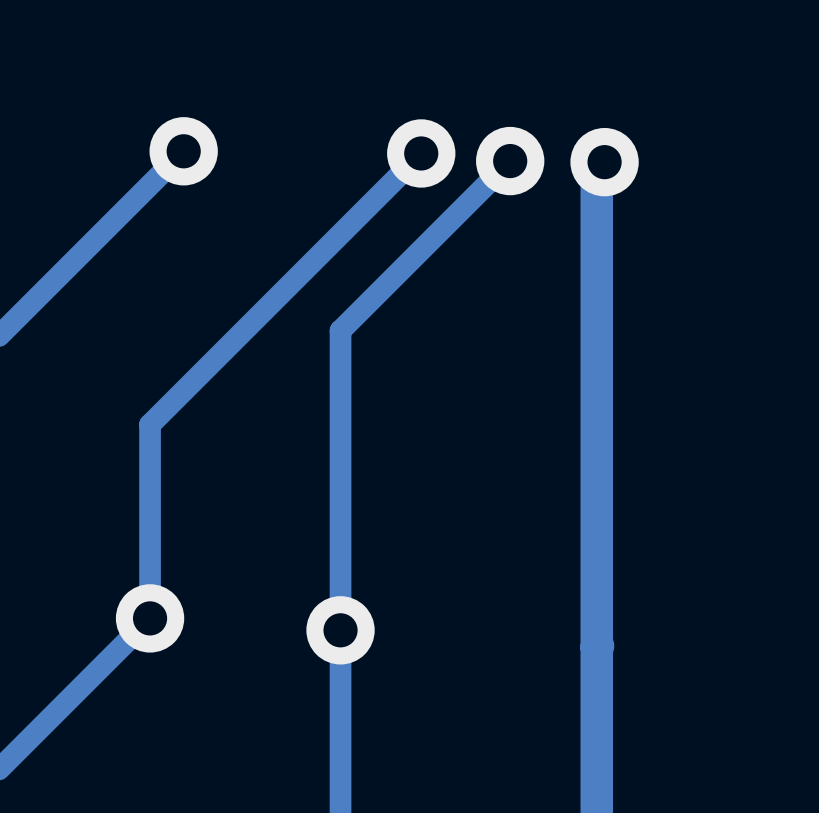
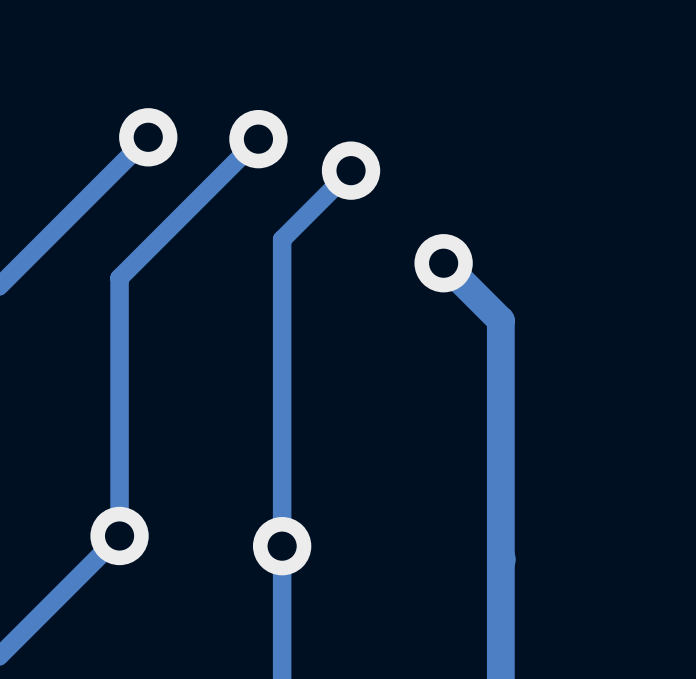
via: none -> (258, 139)
track: (421, 153) (150, 424) -> (258, 139) (119, 278) (119, 370)
via position: (421, 153) -> (351, 170)
track: (510, 161) (340, 330) -> (351, 170) (282, 239) (282, 290)
via: (510, 161) -> none
track: (604, 162) (596, 169) (596, 365) -> (443, 263) (500, 320)
via: (604, 162) -> none
via: none -> (443, 263)

